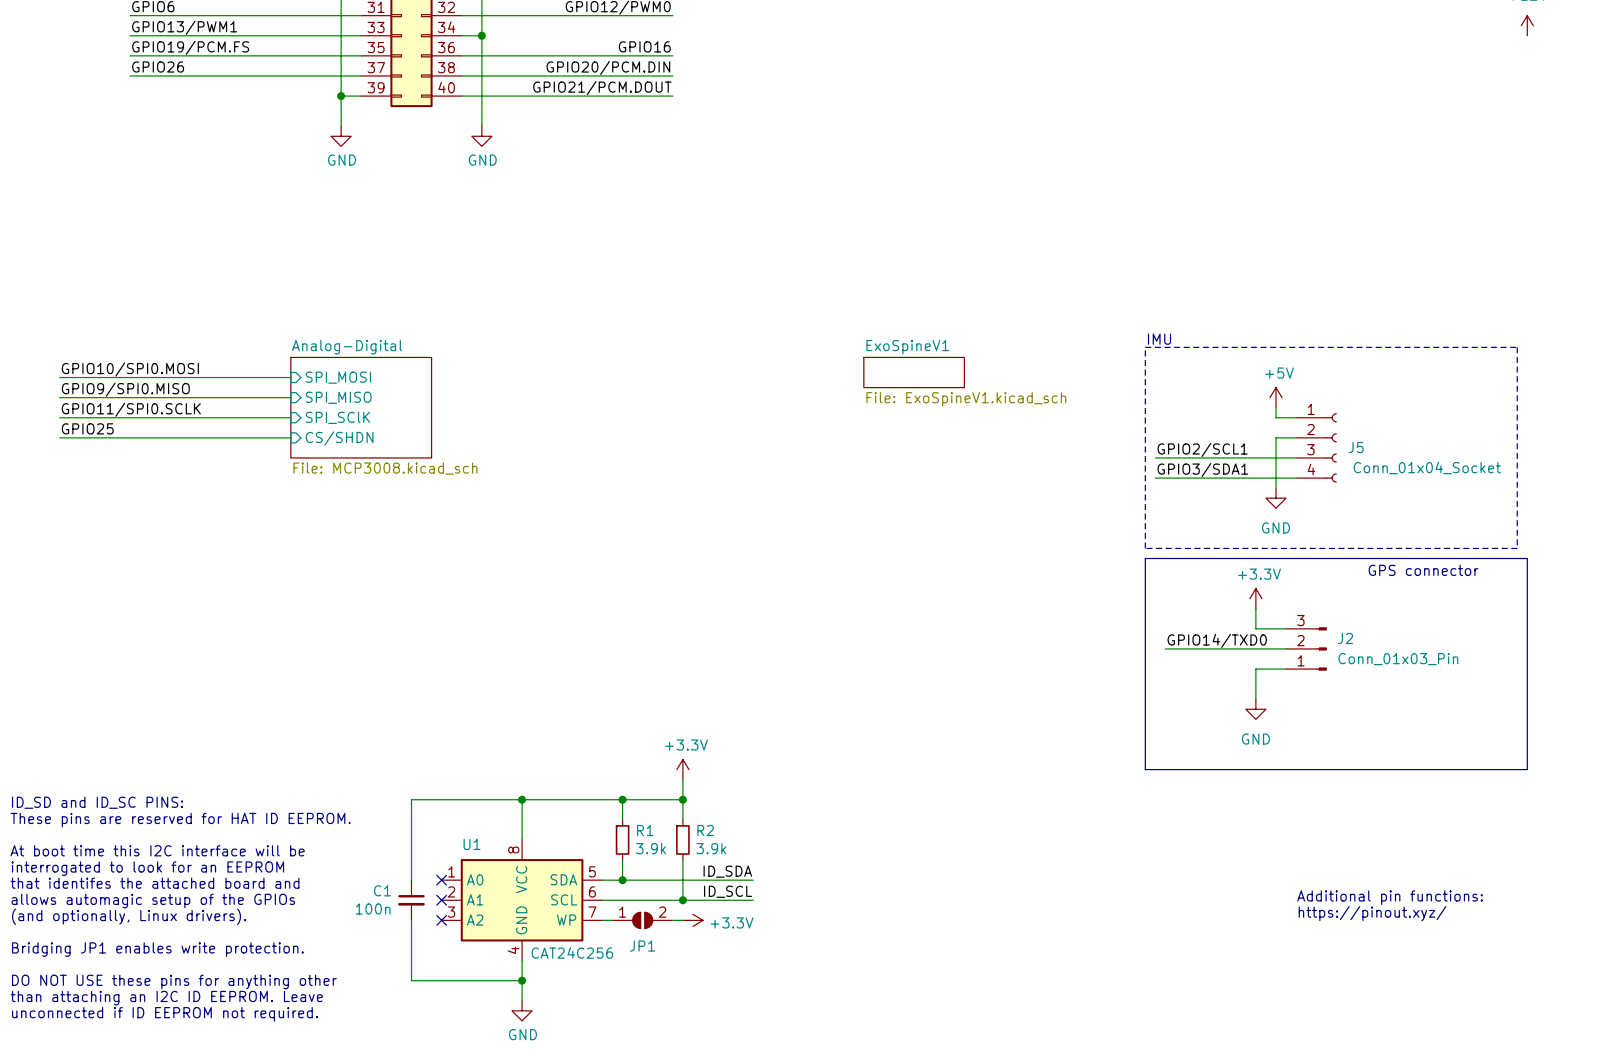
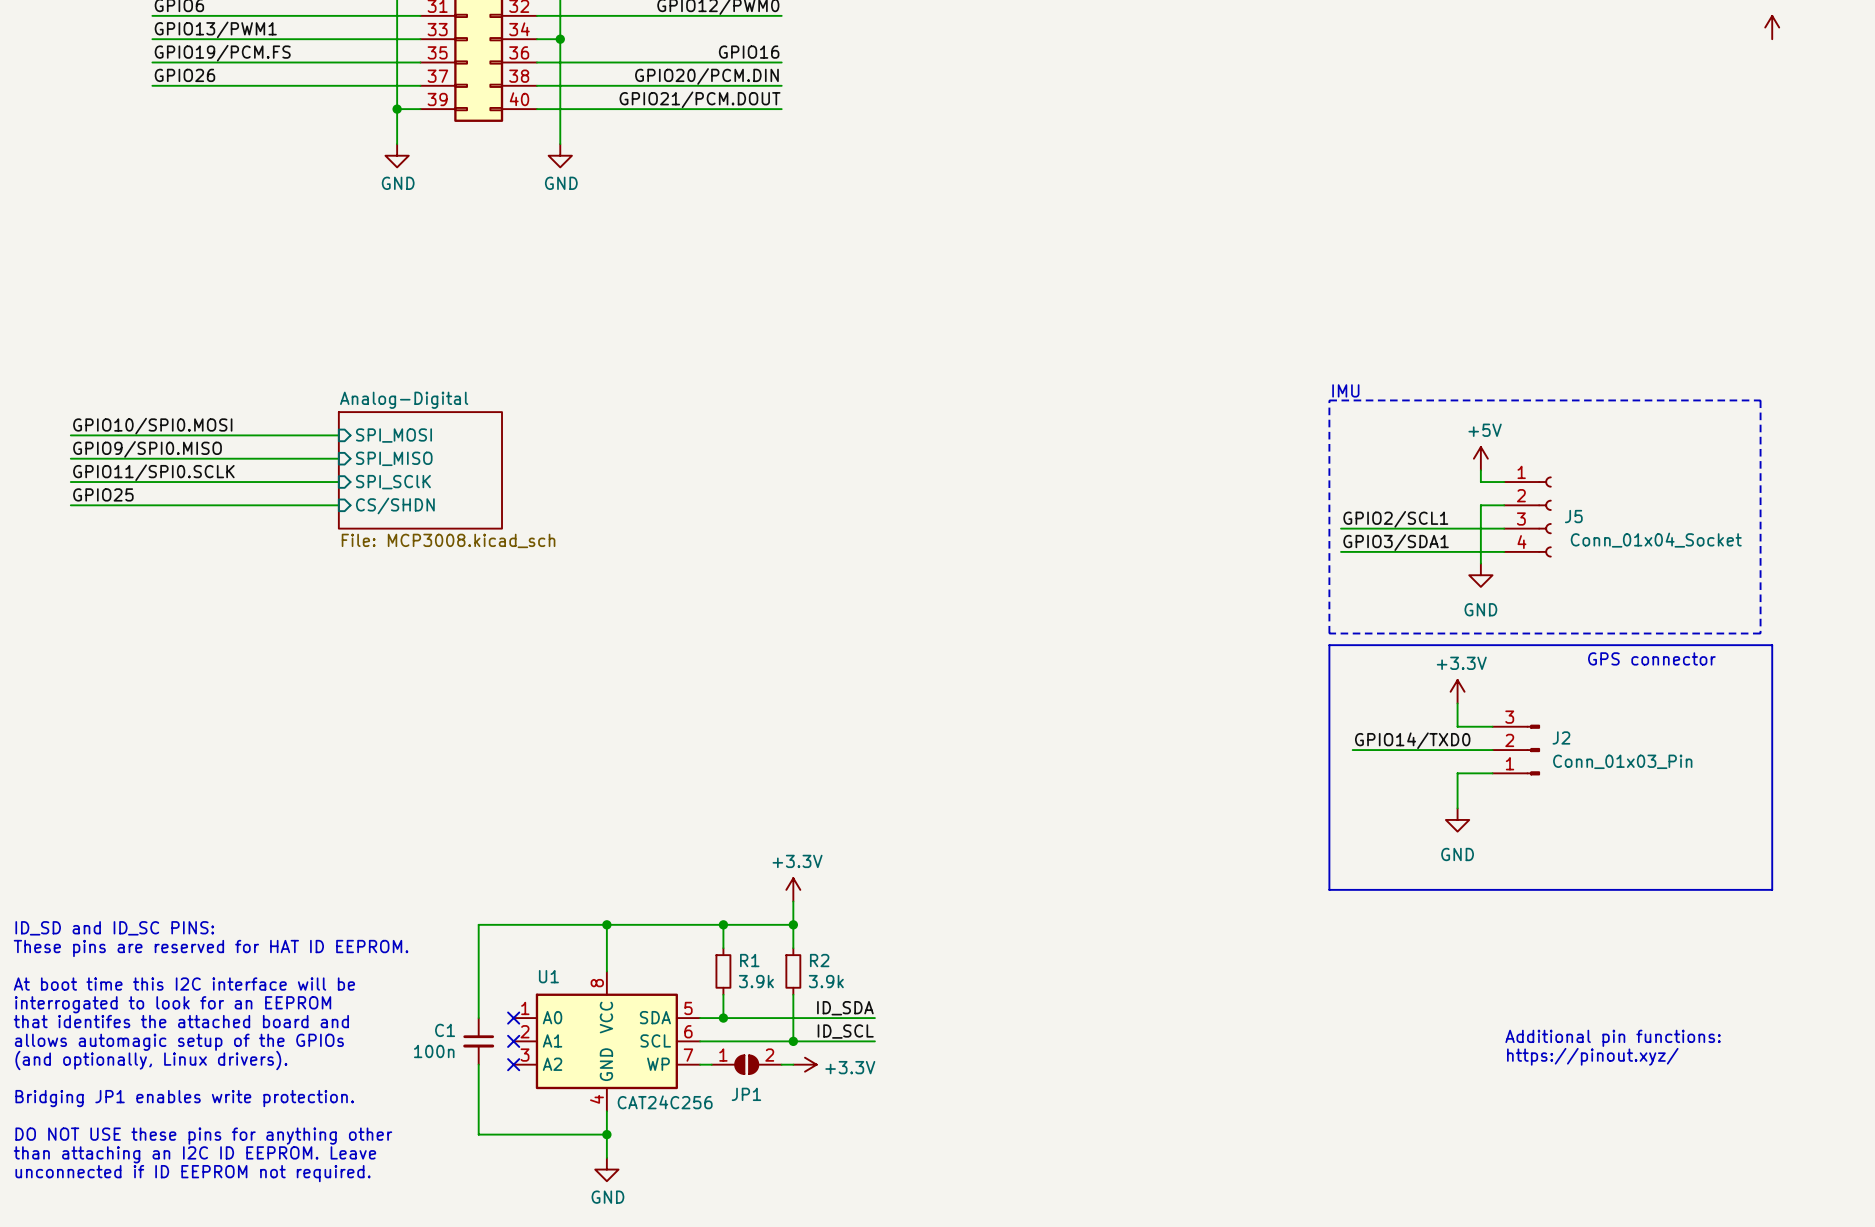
sheet ExoSpineV1: File: ExoSpineV1.kicad_sch (914, 372) -> none

